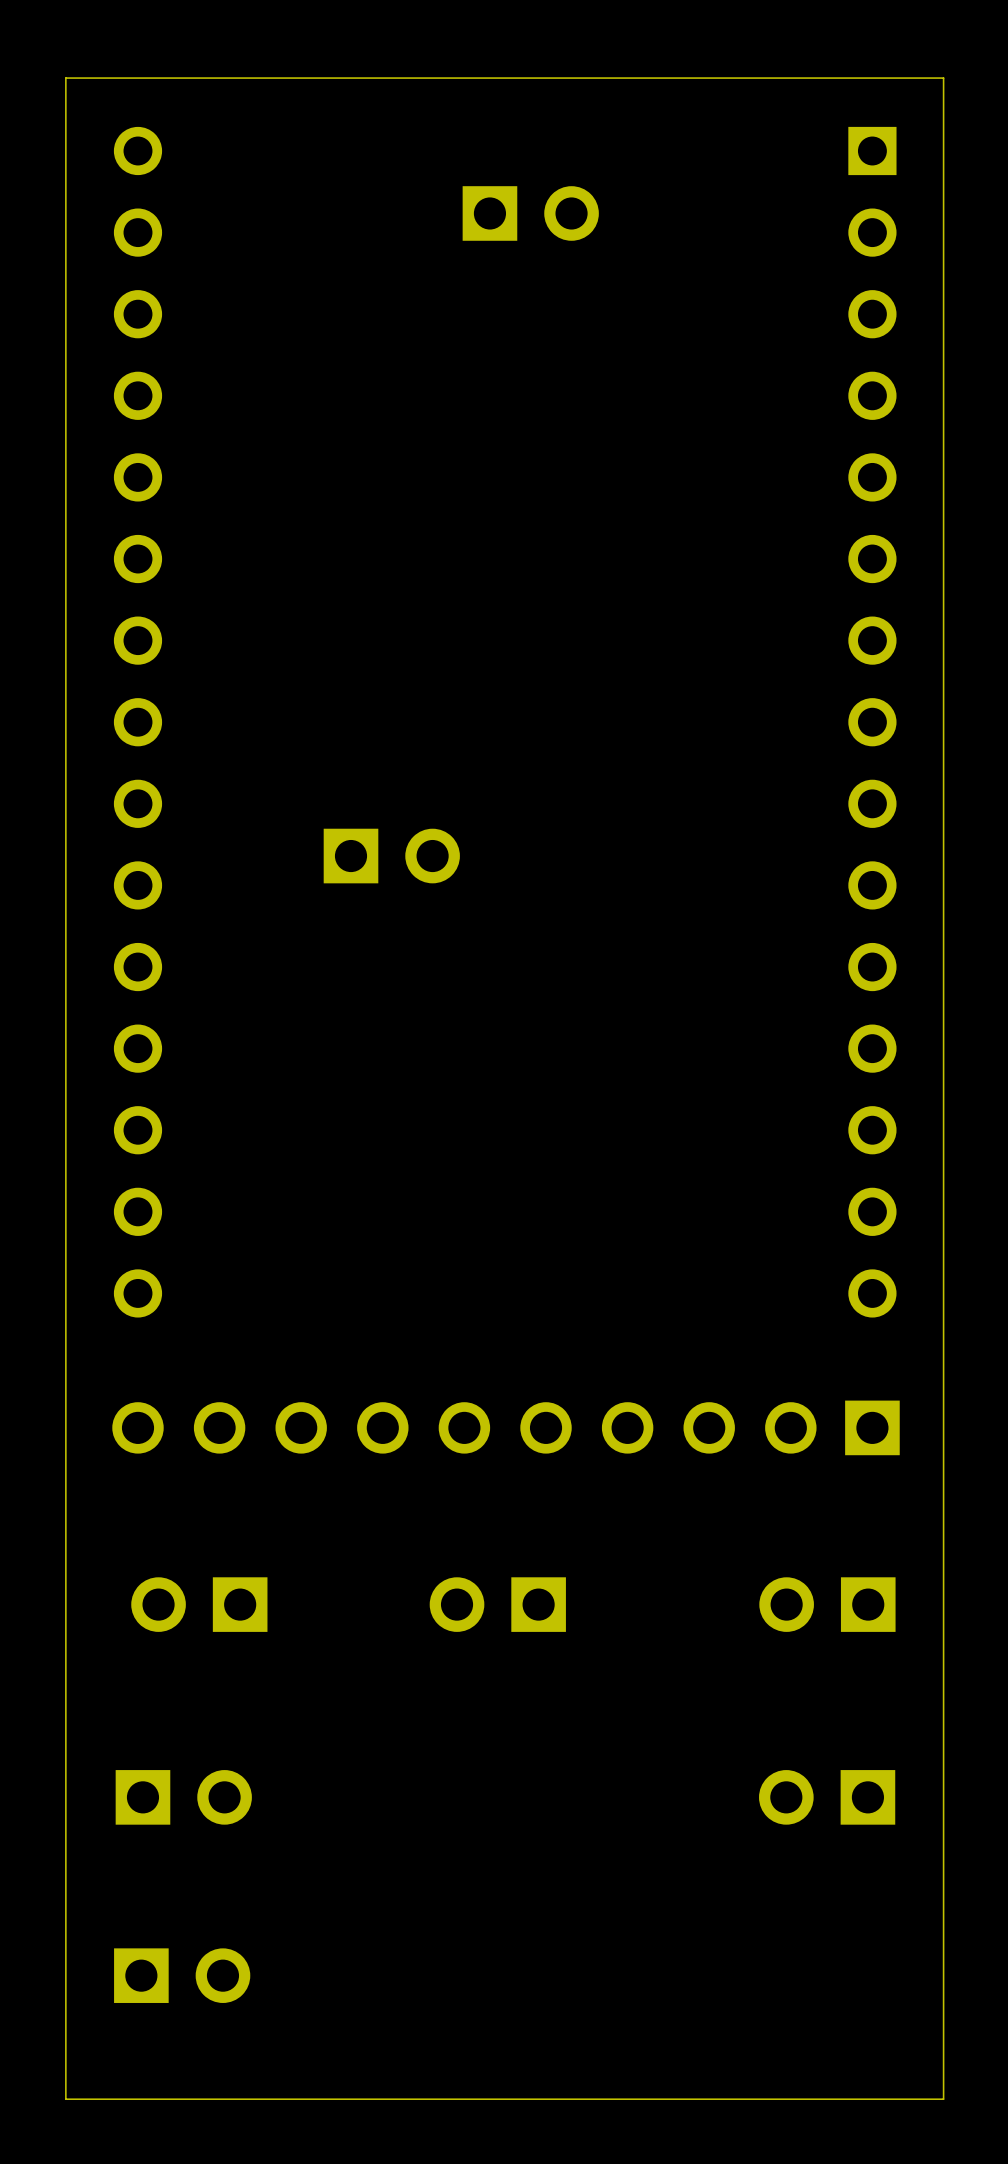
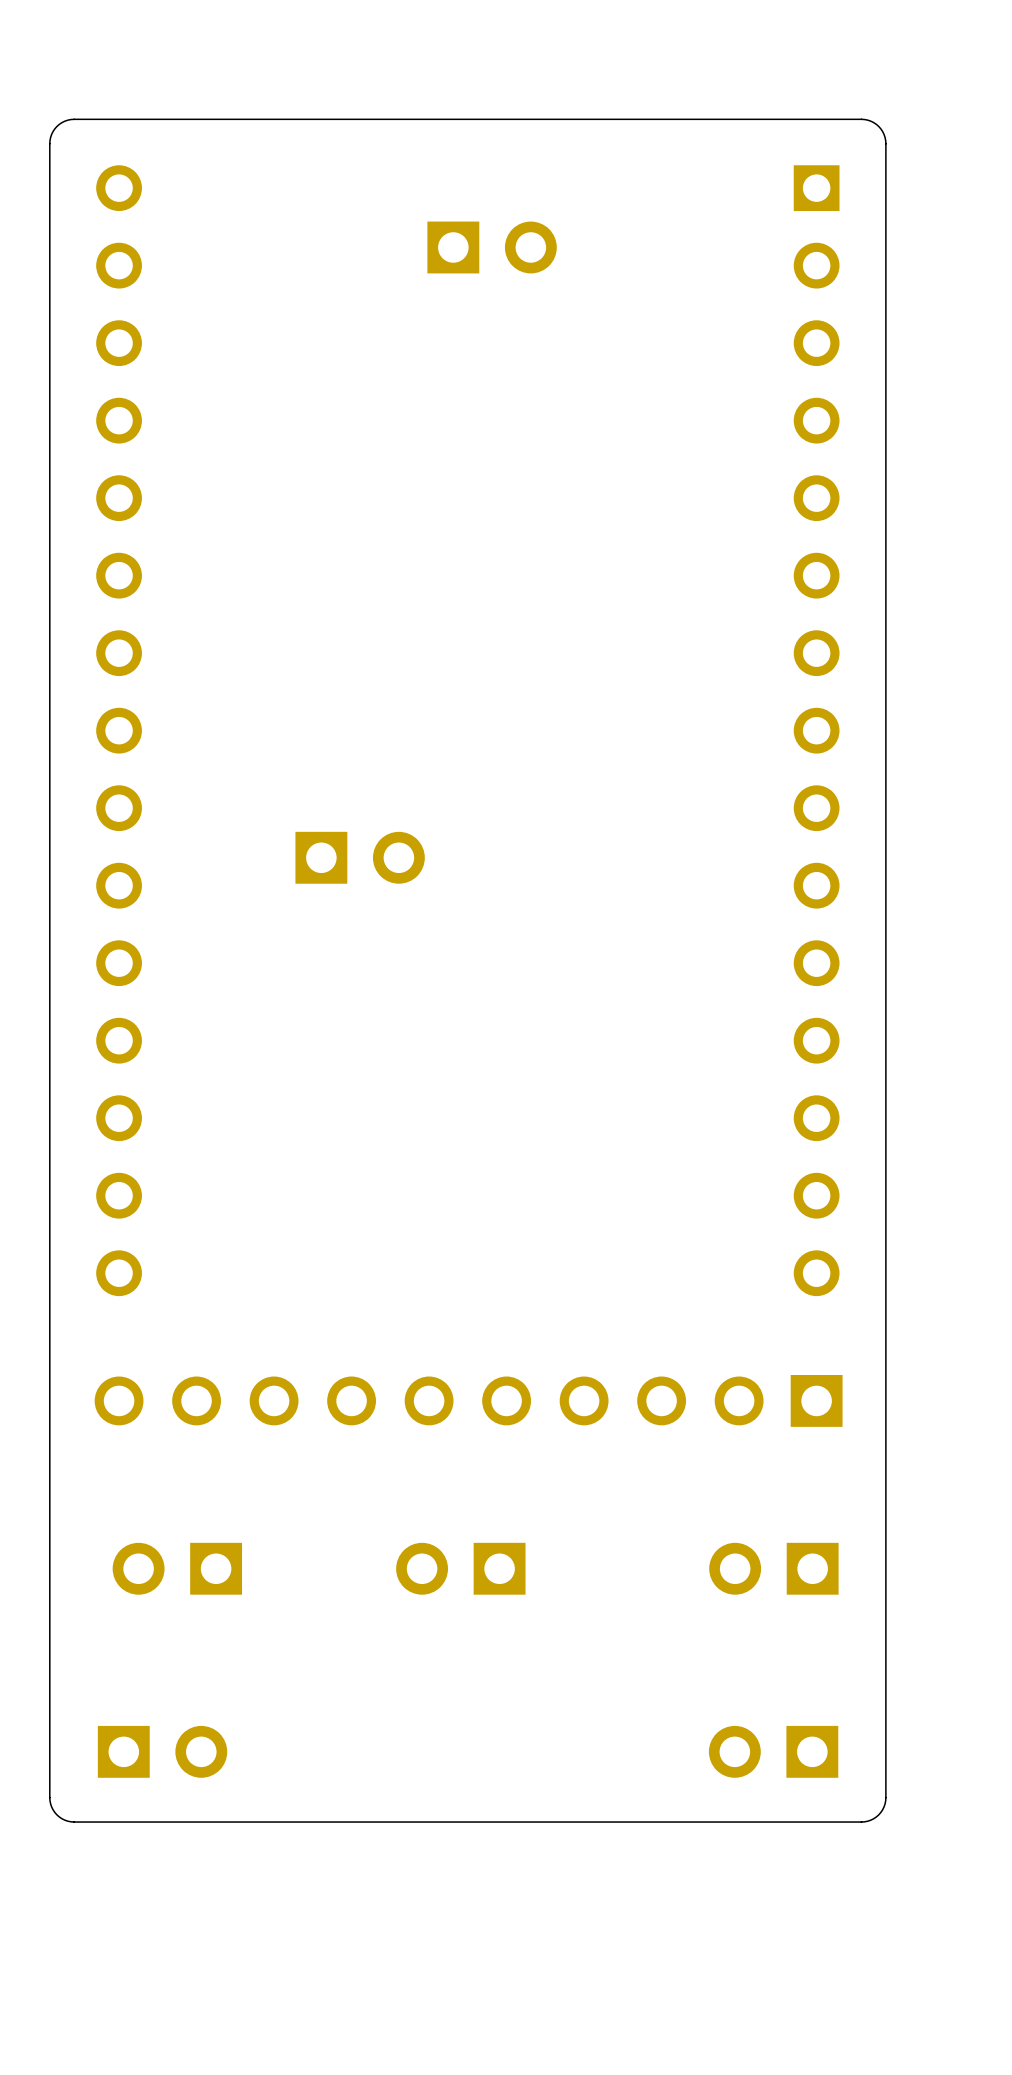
board edge: (943, 78) (65, 78) (65, 2099) (943, 2099) (943, 78) -> (861, 119) (870, 121) (878, 126) (884, 134) (885, 143) (885, 1797) (884, 1806) (873, 1818) (861, 1822) (74, 1822) (64, 1820) (53, 1809) (49, 1797) (49, 143) (51, 134) (62, 122) (74, 119) (861, 119)
part: (182, 1975) -> none

